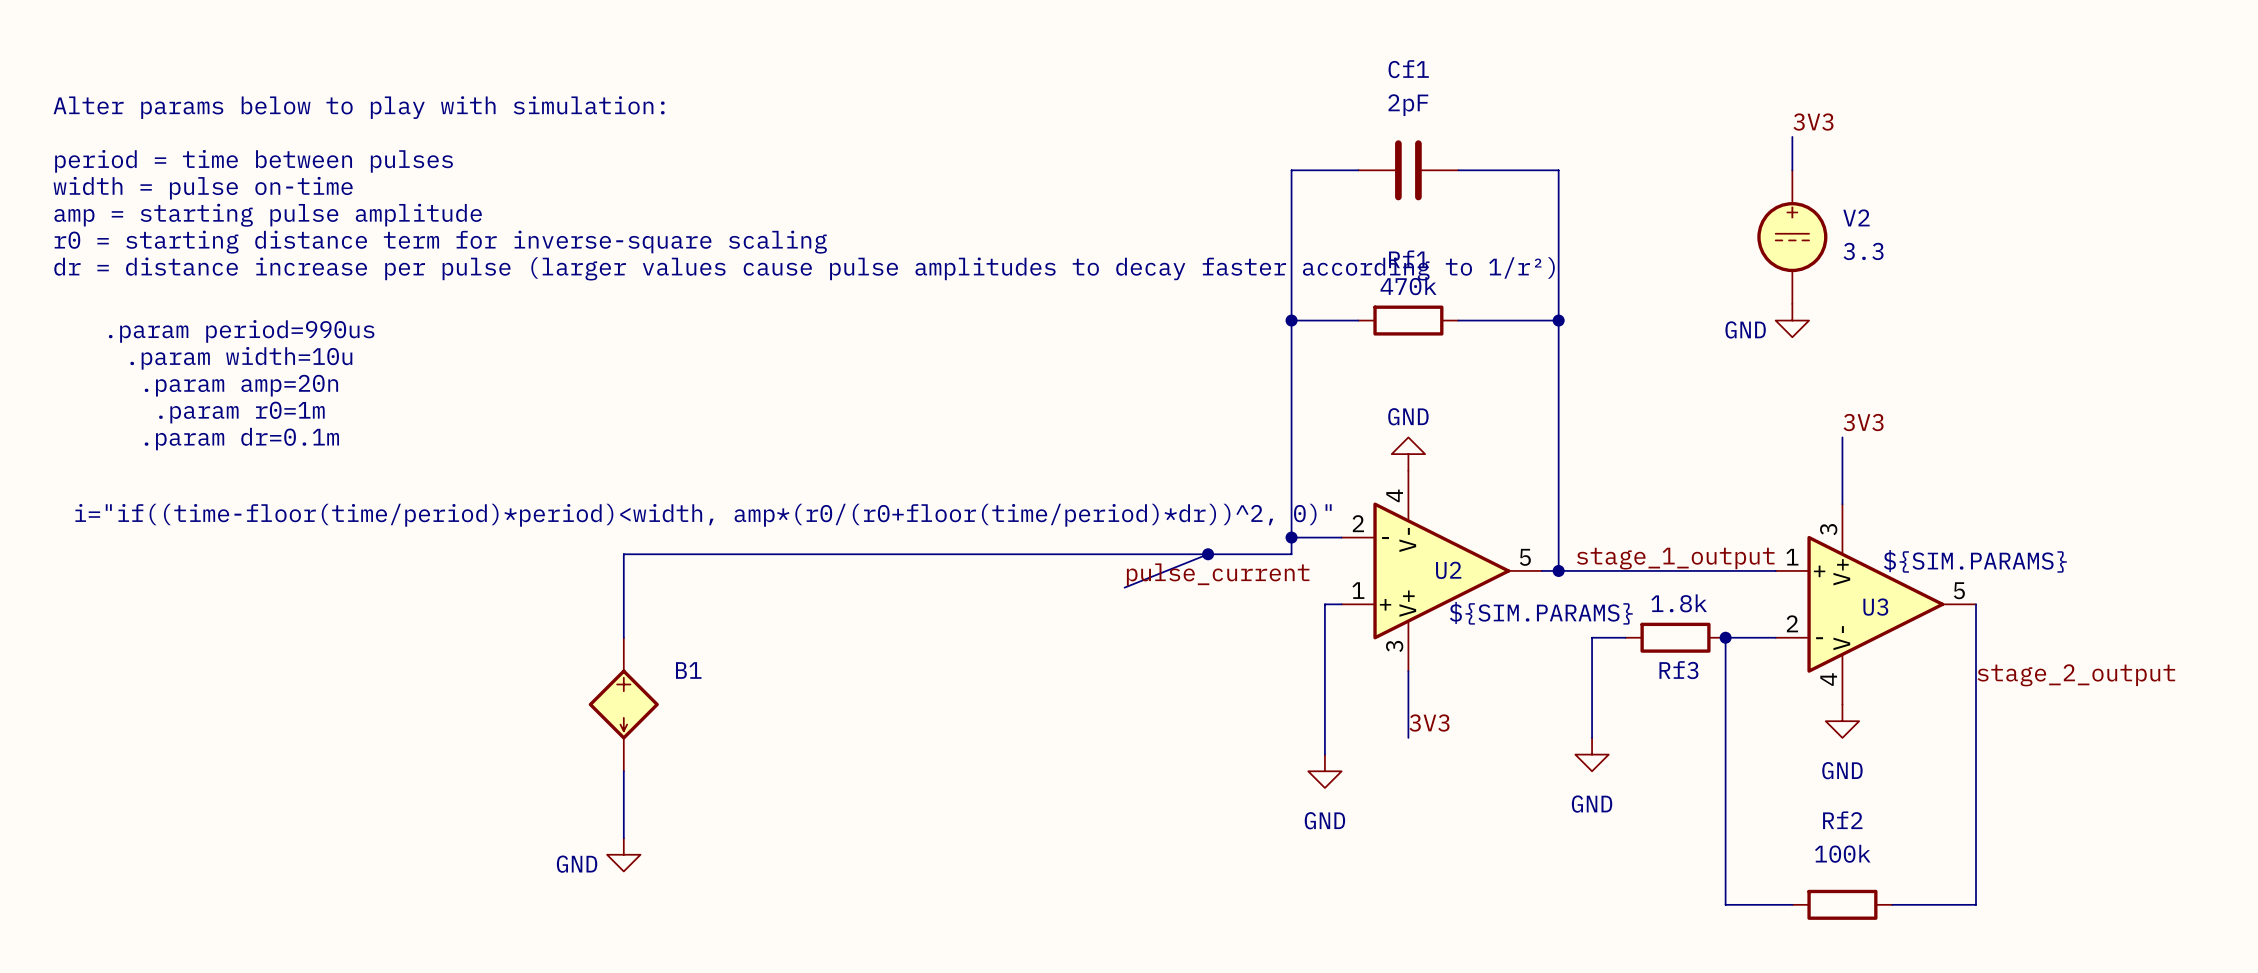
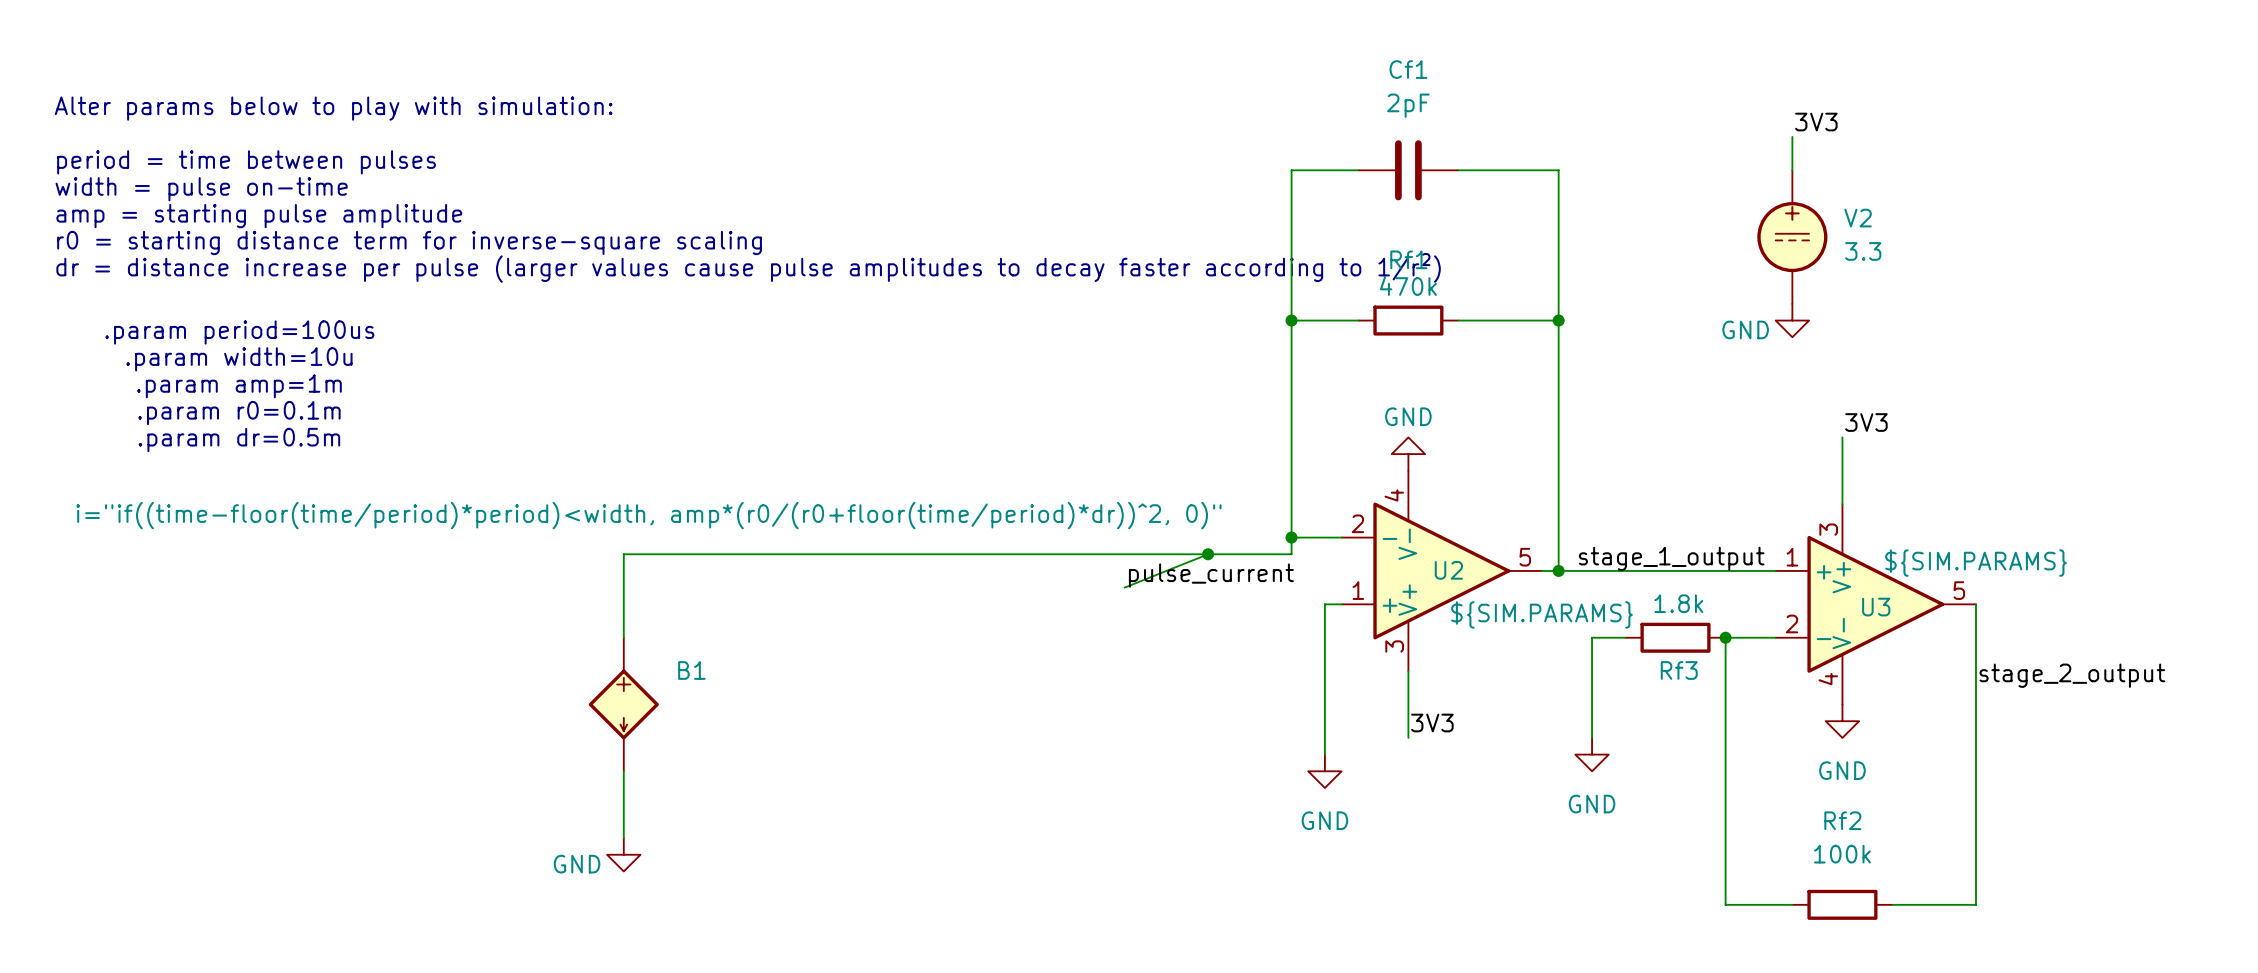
text: .param period=990us (241, 331) -> .param period=100us (239, 332)
text: .param amp=20n (241, 385) -> .param amp=1m (239, 386)
text: .param r0=1m (241, 412) -> .param r0=0.1m (239, 413)
text: .param dr=0.1m (241, 439) -> .param dr=0.5m (239, 439)

